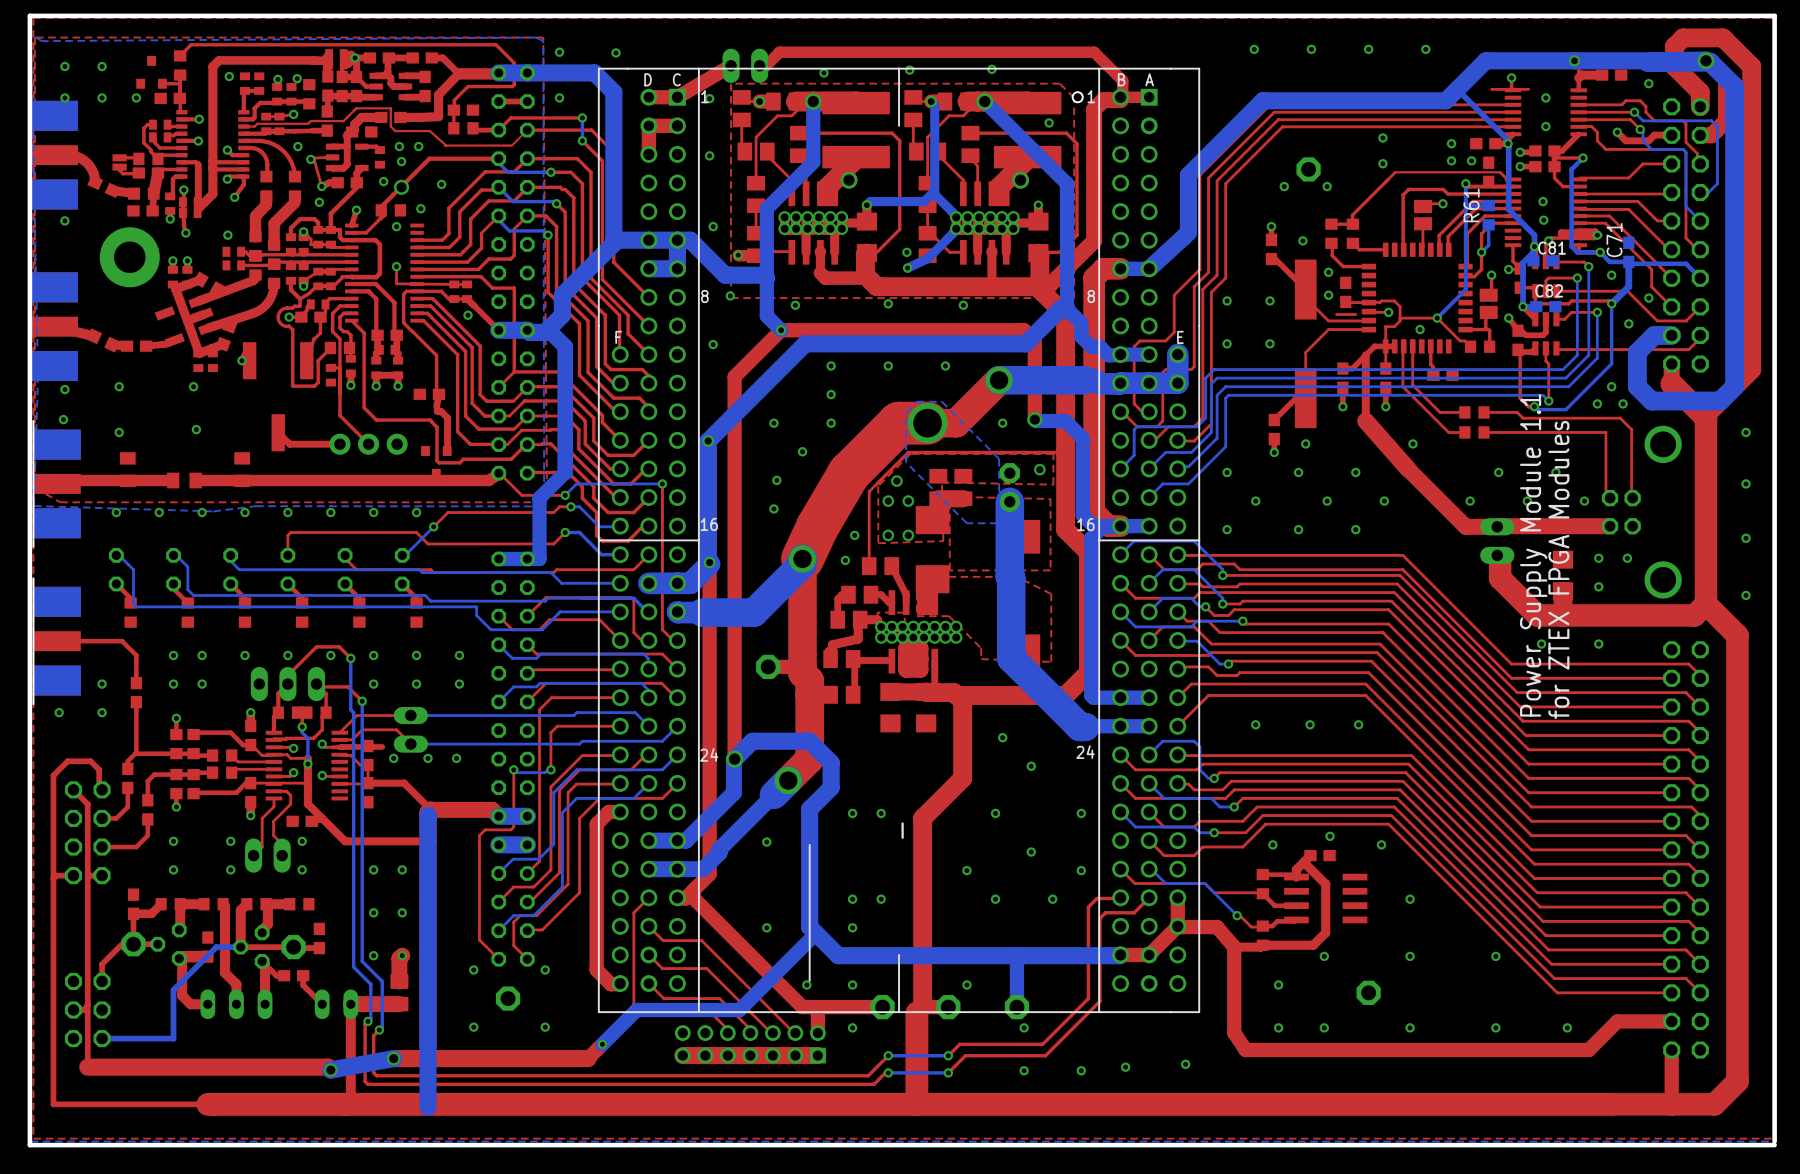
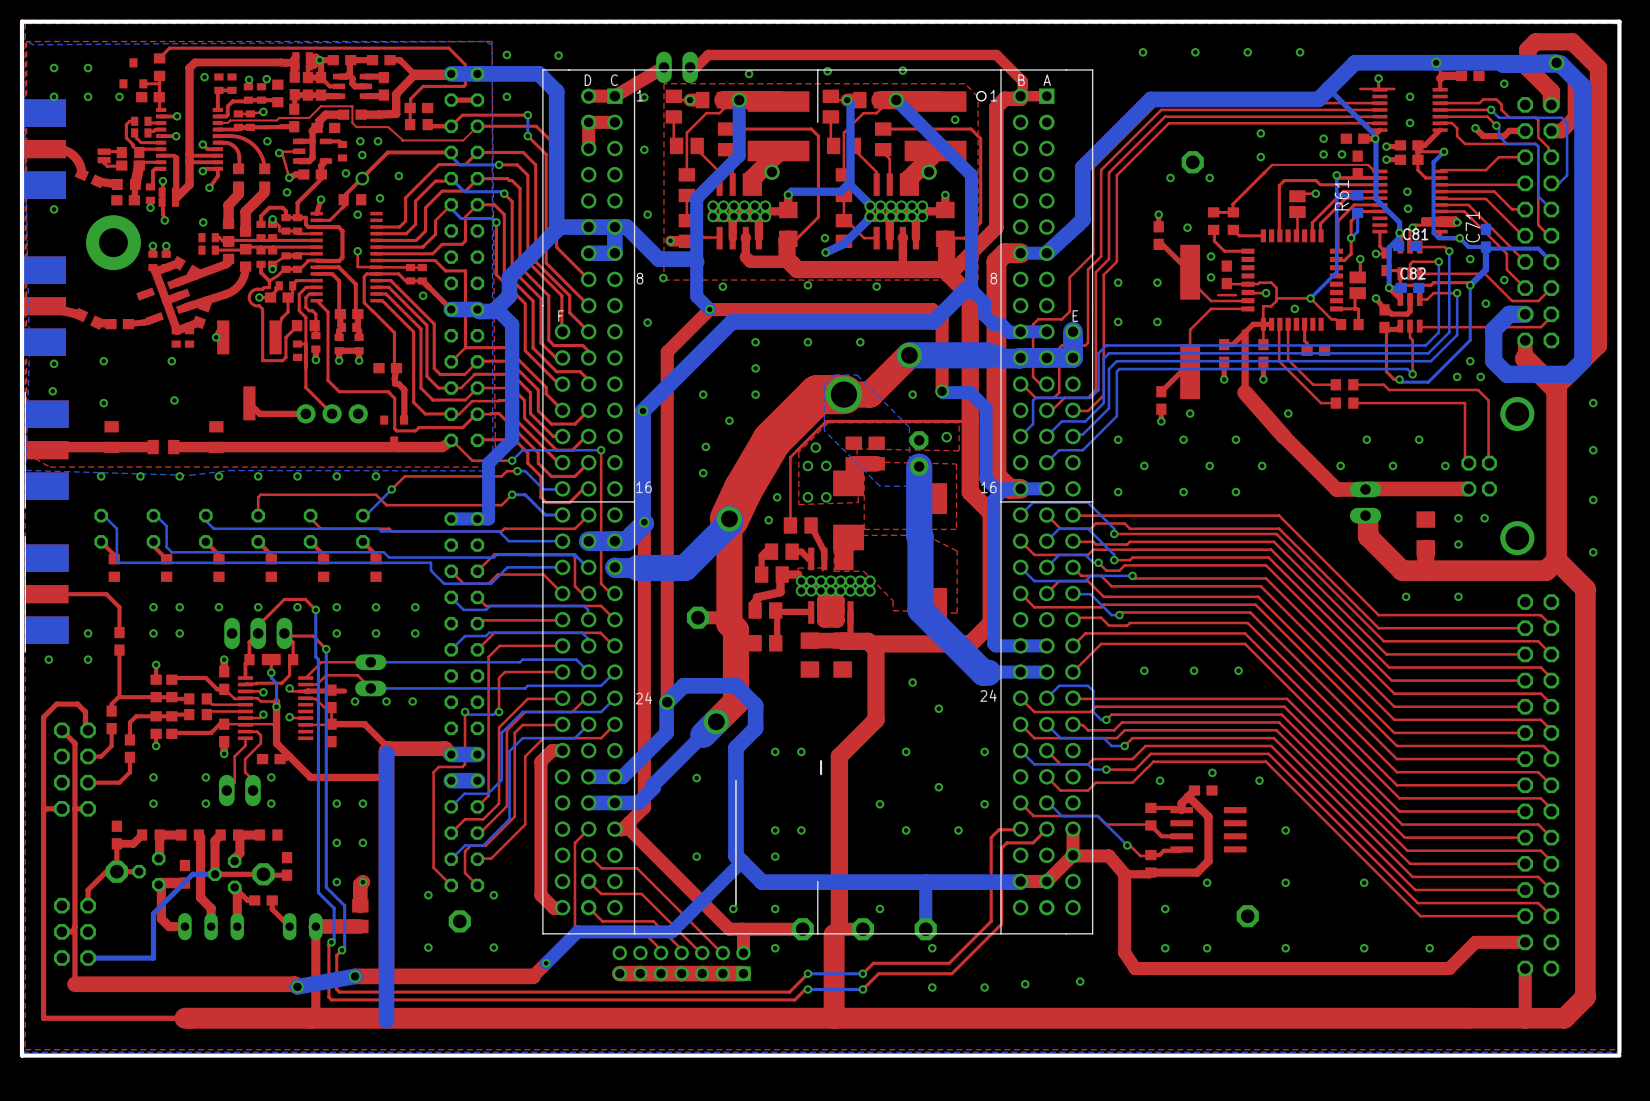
text: Power Supply Module 1.1 (1533, 555) -> none
text: for ZTEX FPGA Modules (1558, 569) -> none

